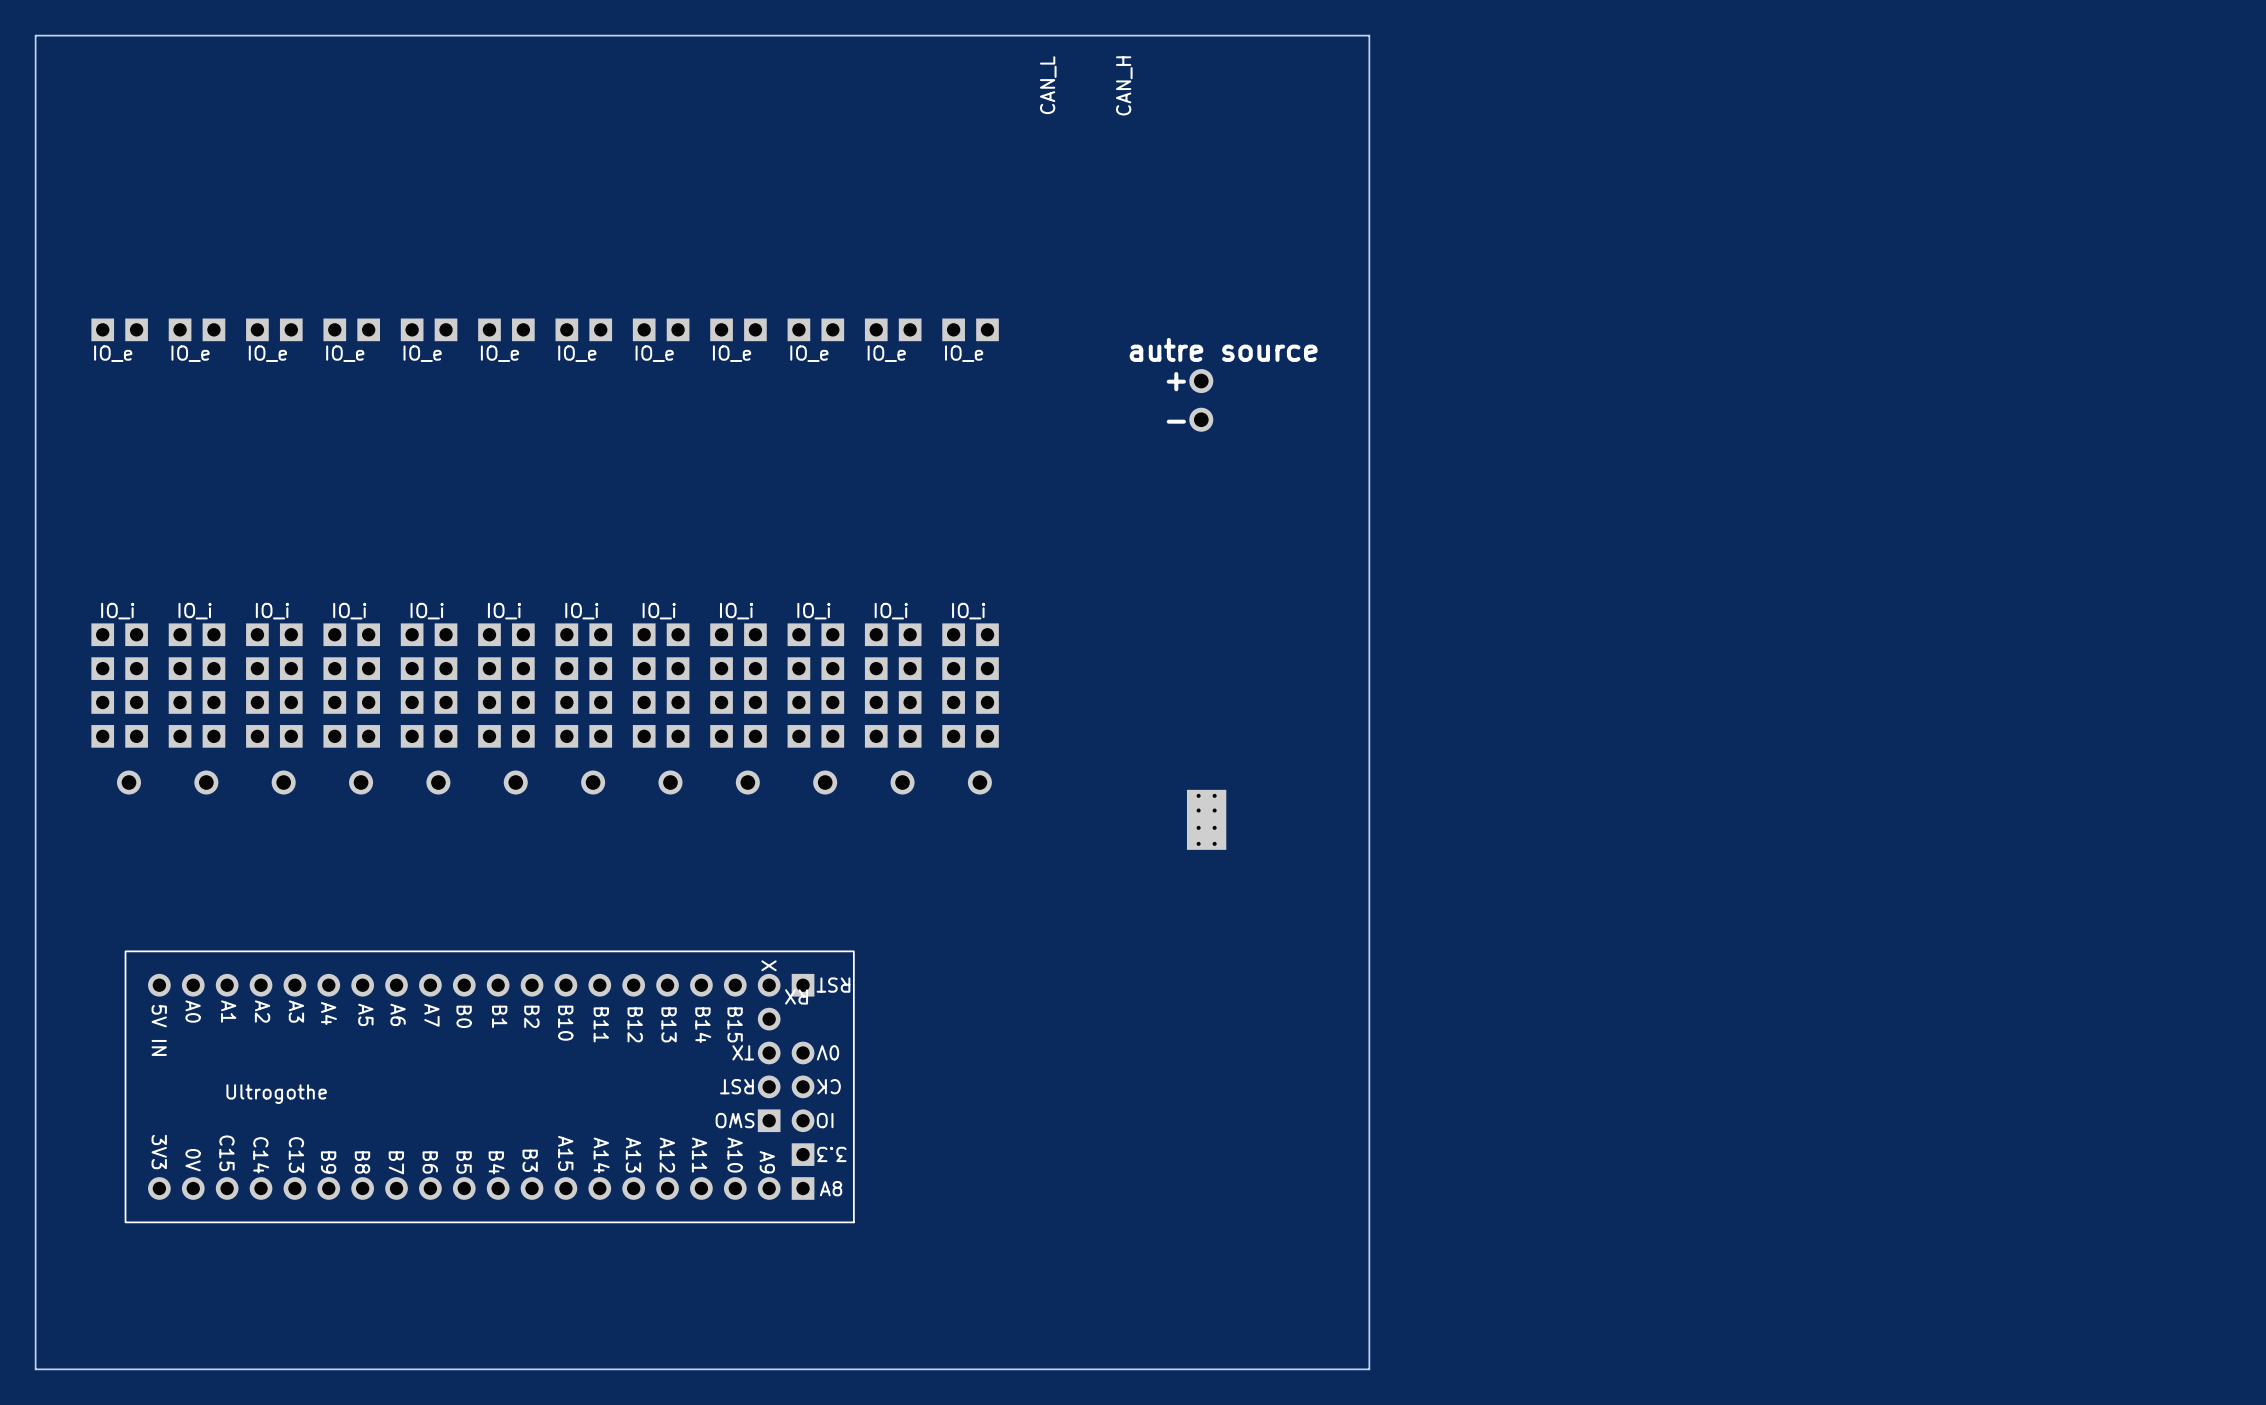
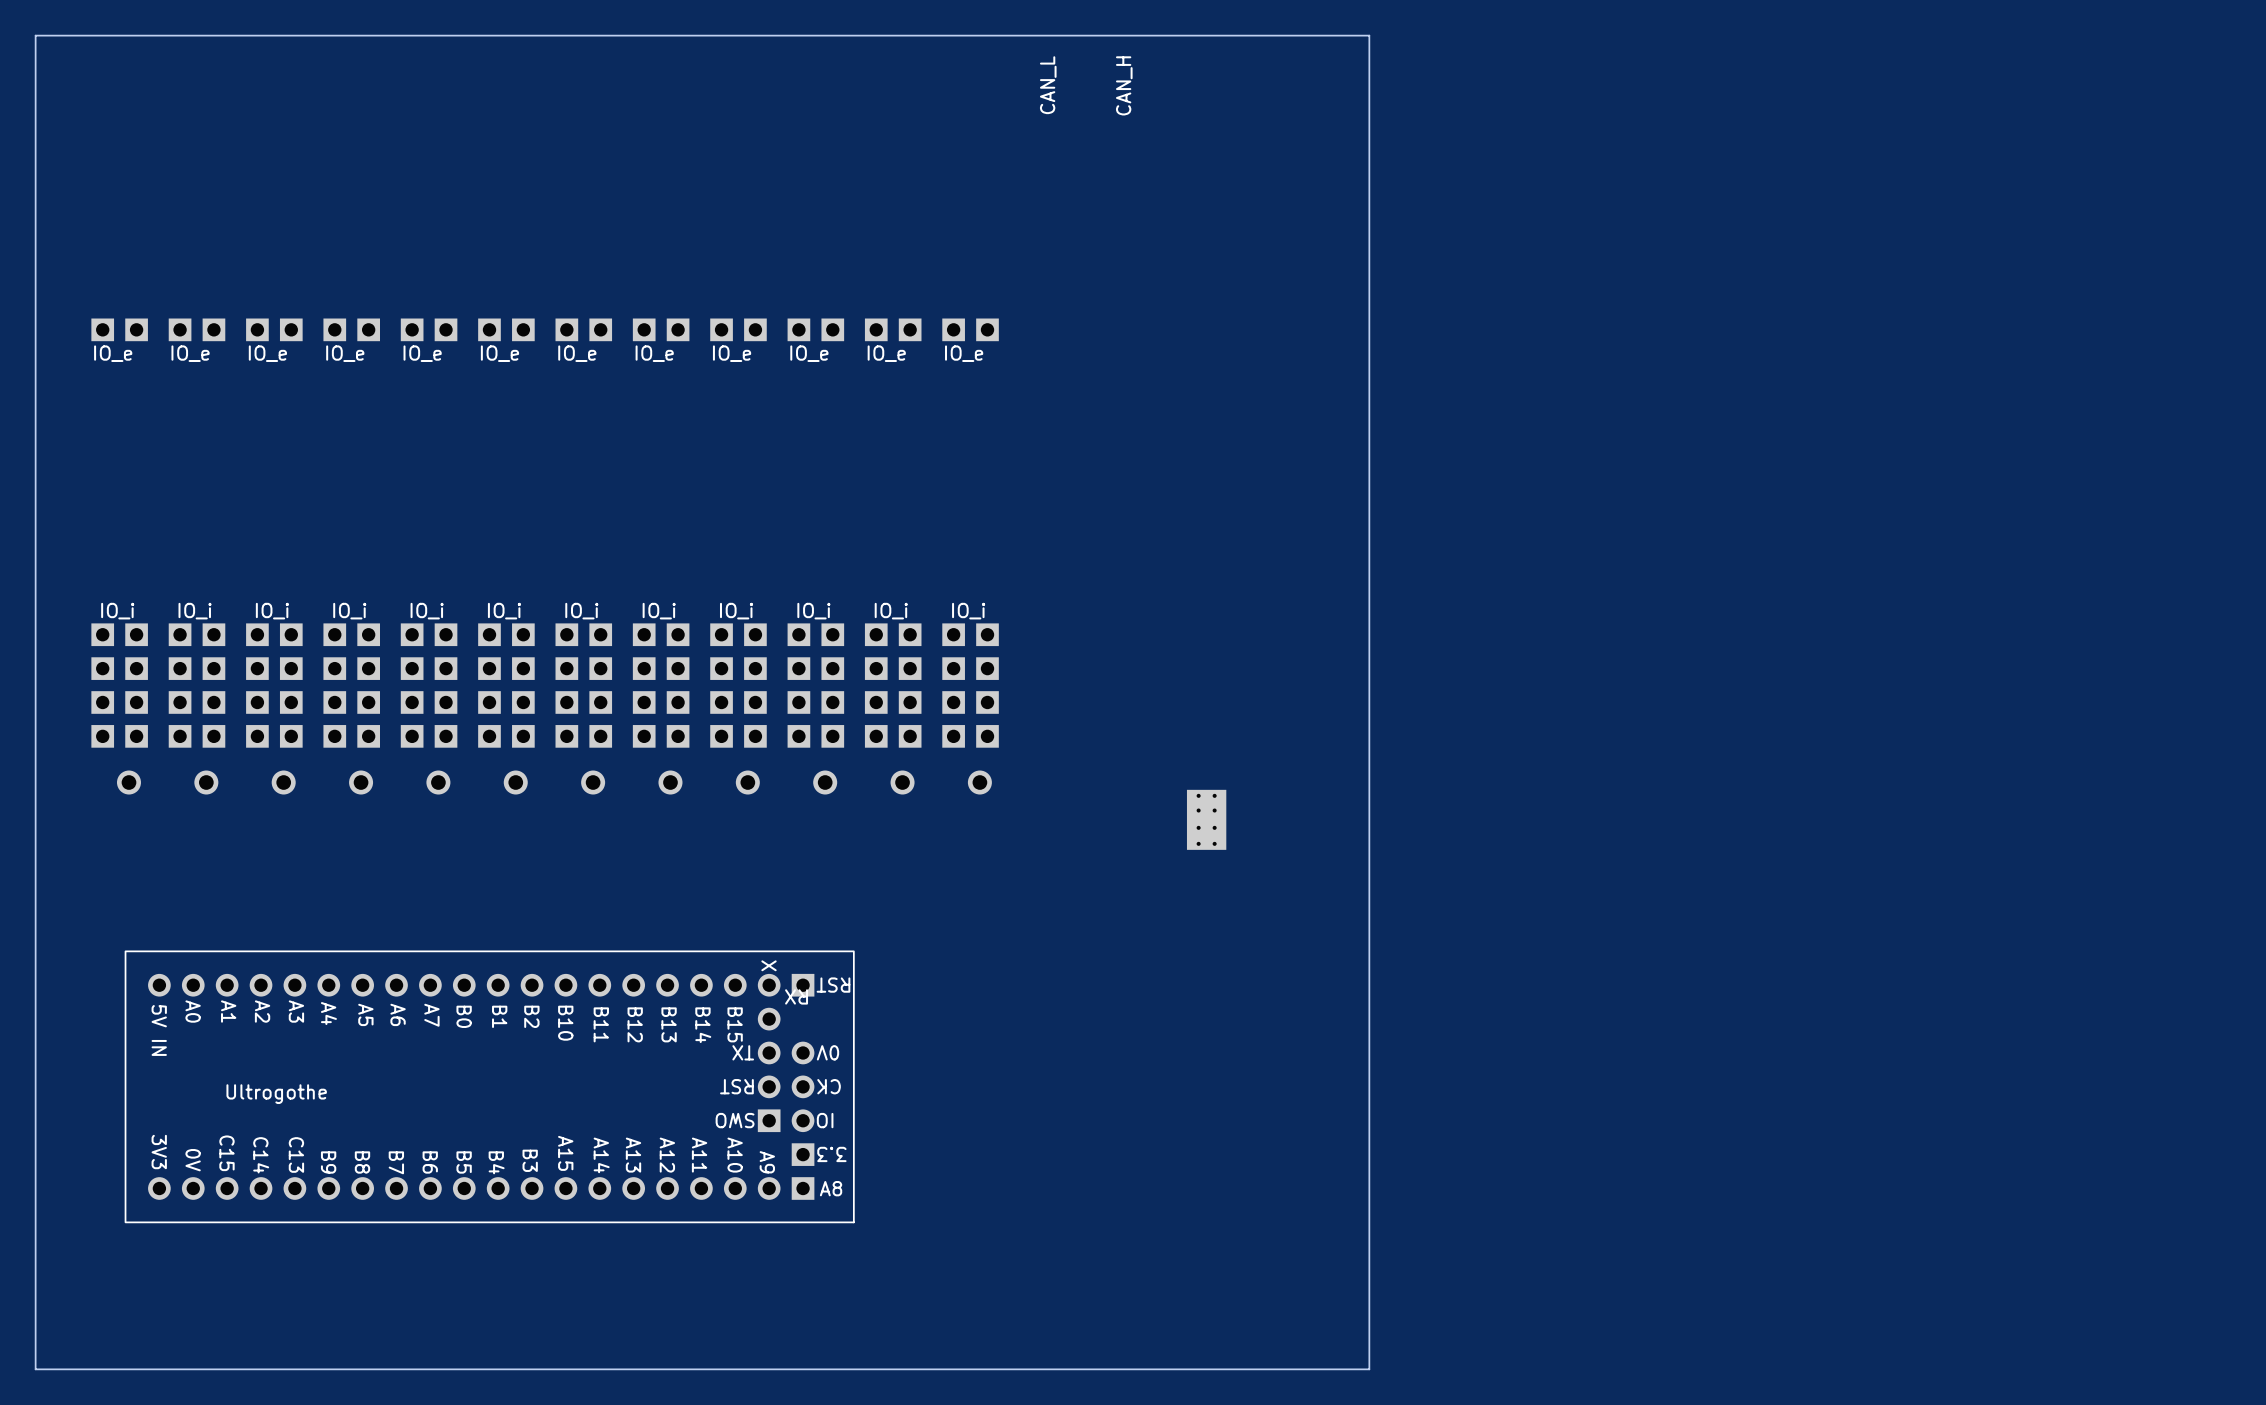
text: autre source (1223, 349) -> none
text: + (1176, 381) -> none
part: (1201, 381) -> none
part: (1201, 419) -> none
text: - (1176, 421) -> none

